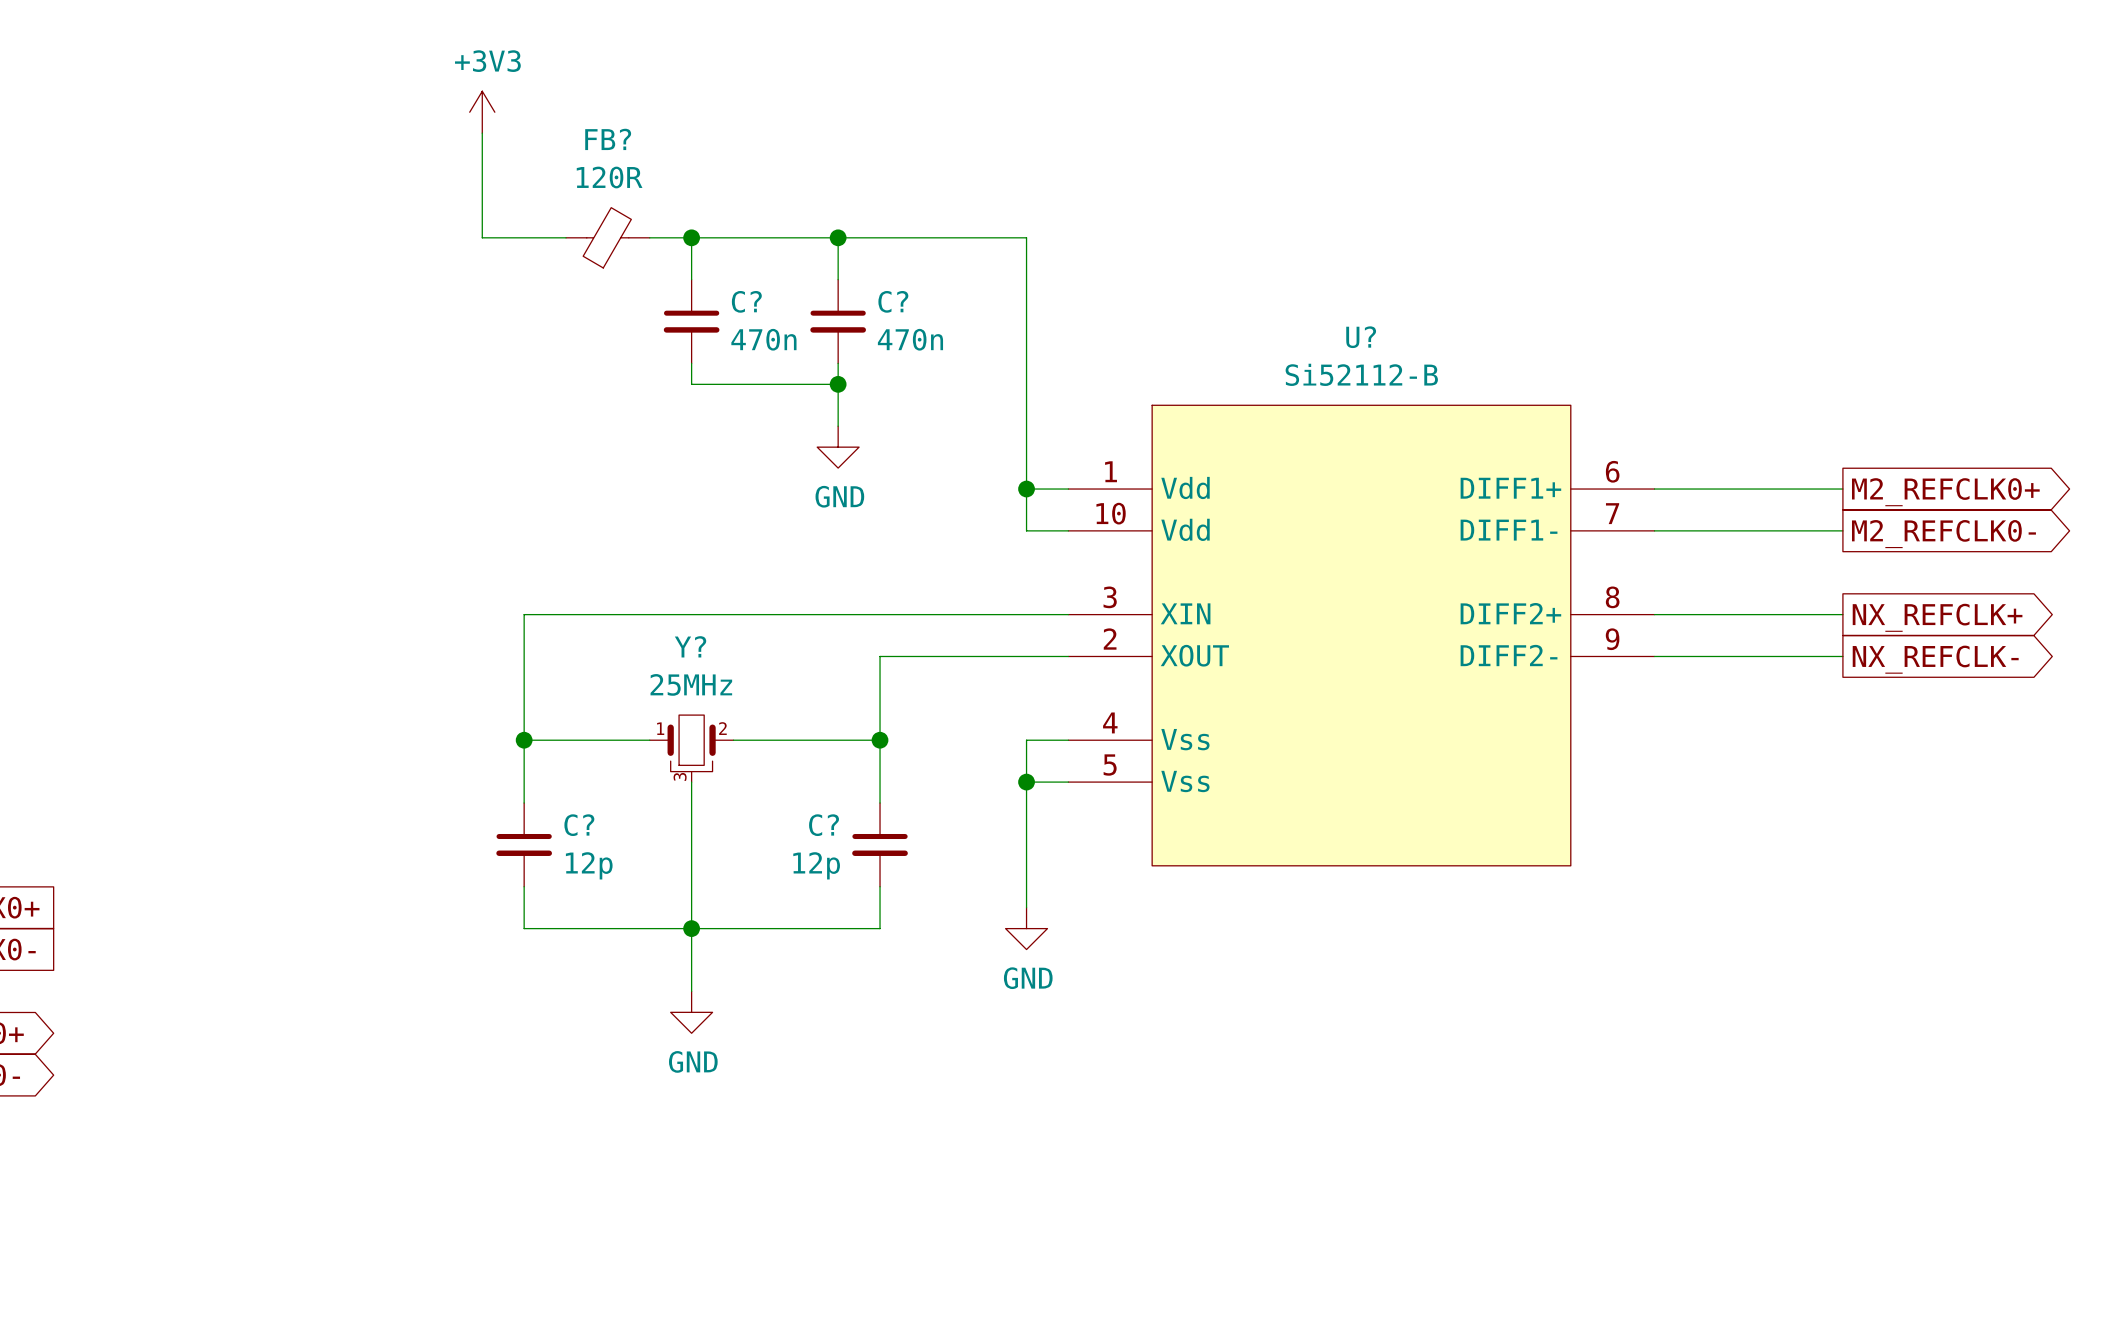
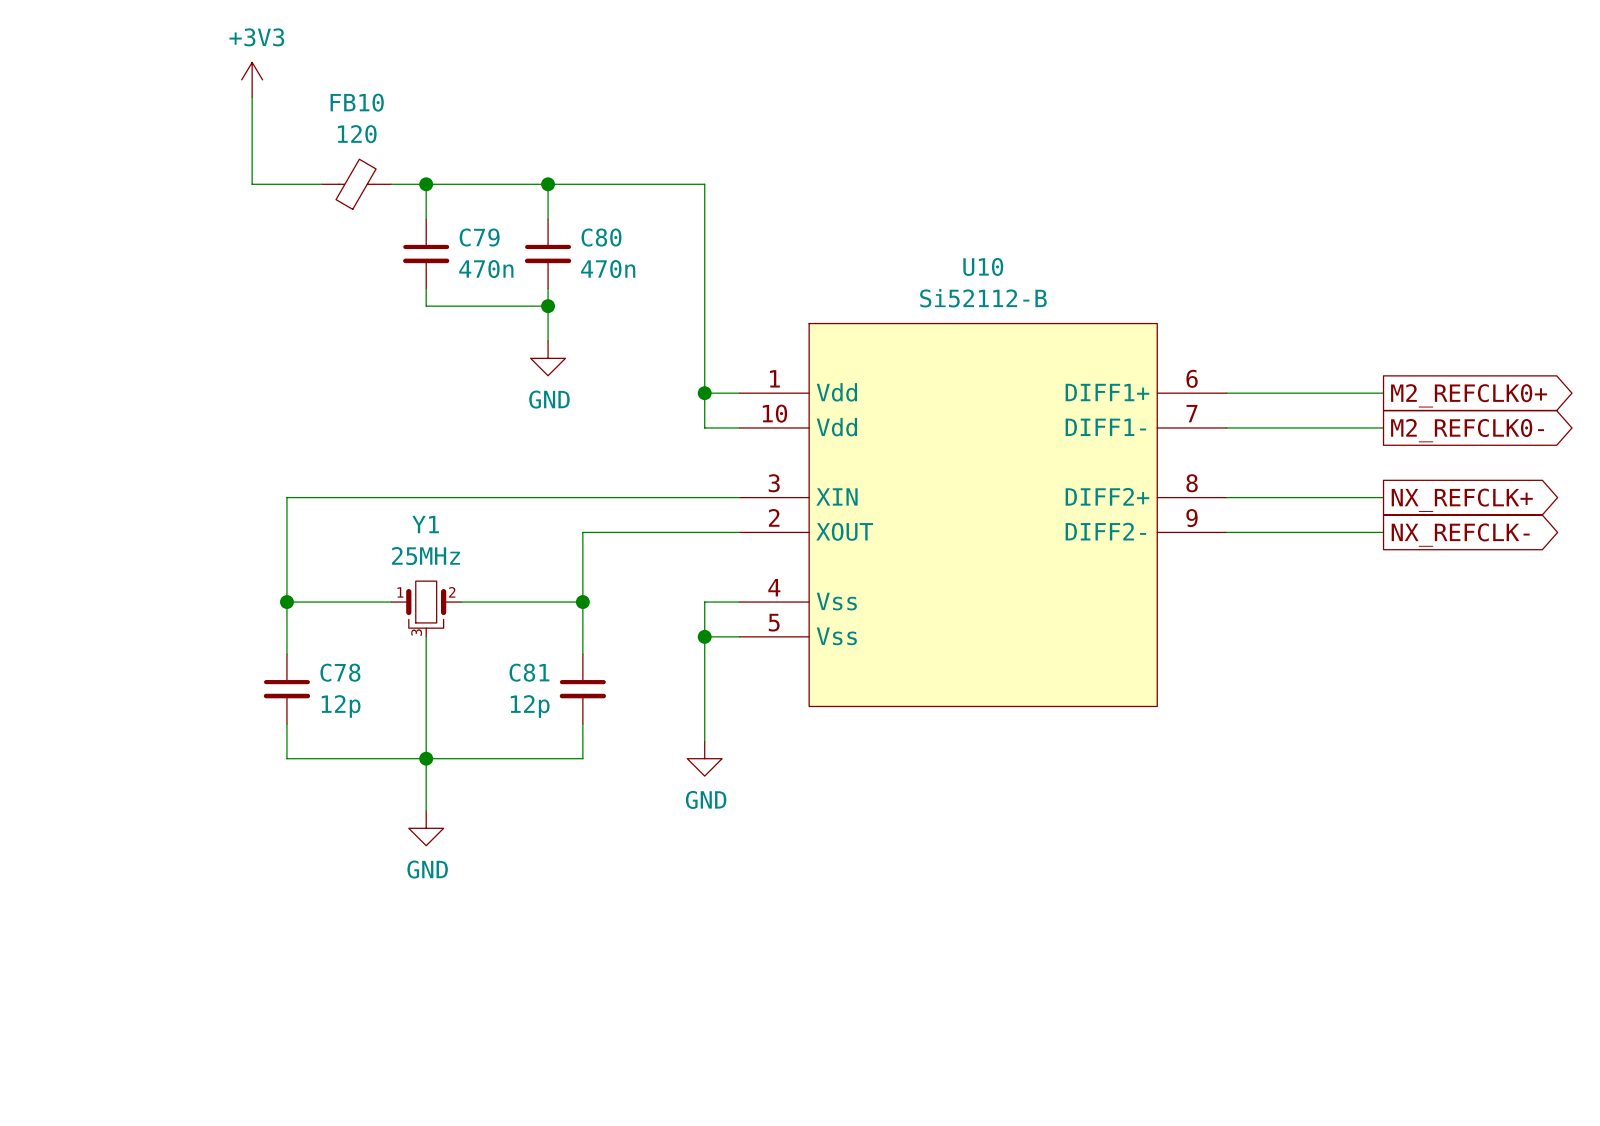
FB? name: FB? (608, 139) -> FB10 (357, 102)
FB? value: 120R (609, 177) -> 120 (357, 134)
C? name: C? (746, 301) -> C79 (479, 237)
C? name: C? (893, 301) -> C80 (601, 237)
U? name: U? (1361, 337) -> U10 (983, 266)
Y? name: Y? (690, 646) -> Y1 (425, 524)
C? name: C? (579, 825) -> C78 (340, 672)
C? name: C? (824, 825) -> C81 (529, 672)

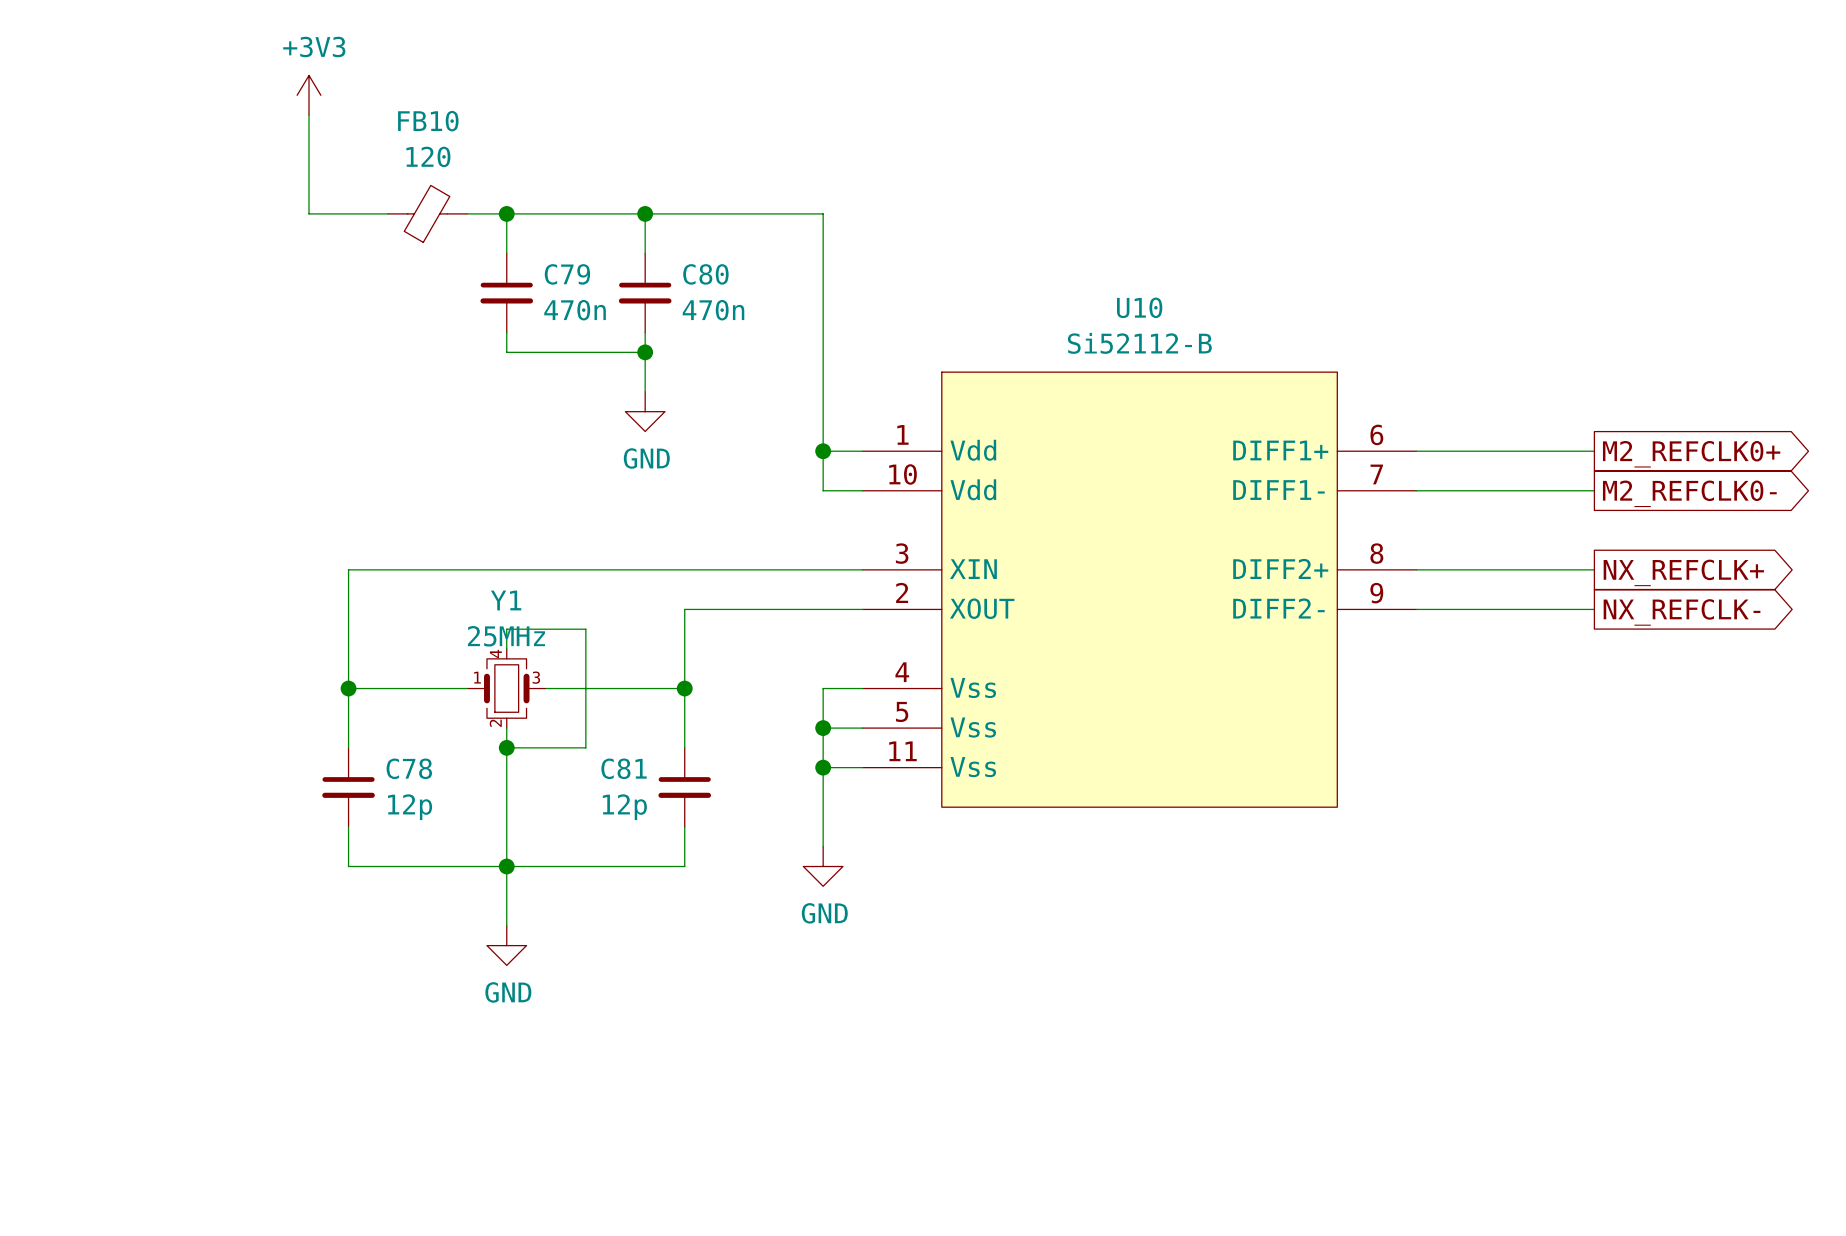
U10 symbol: [739, 323, 1227, 707] -> [862, 372, 1417, 808]
wire: none -> (506, 648) (506, 629) (585, 629) (585, 747) (506, 747)
Y1 symbol: [391, 581, 462, 637] -> [467, 648, 547, 729]
junction: none -> (506, 747)
wire: none -> (823, 767) (862, 767)
junction: none -> (823, 767)

